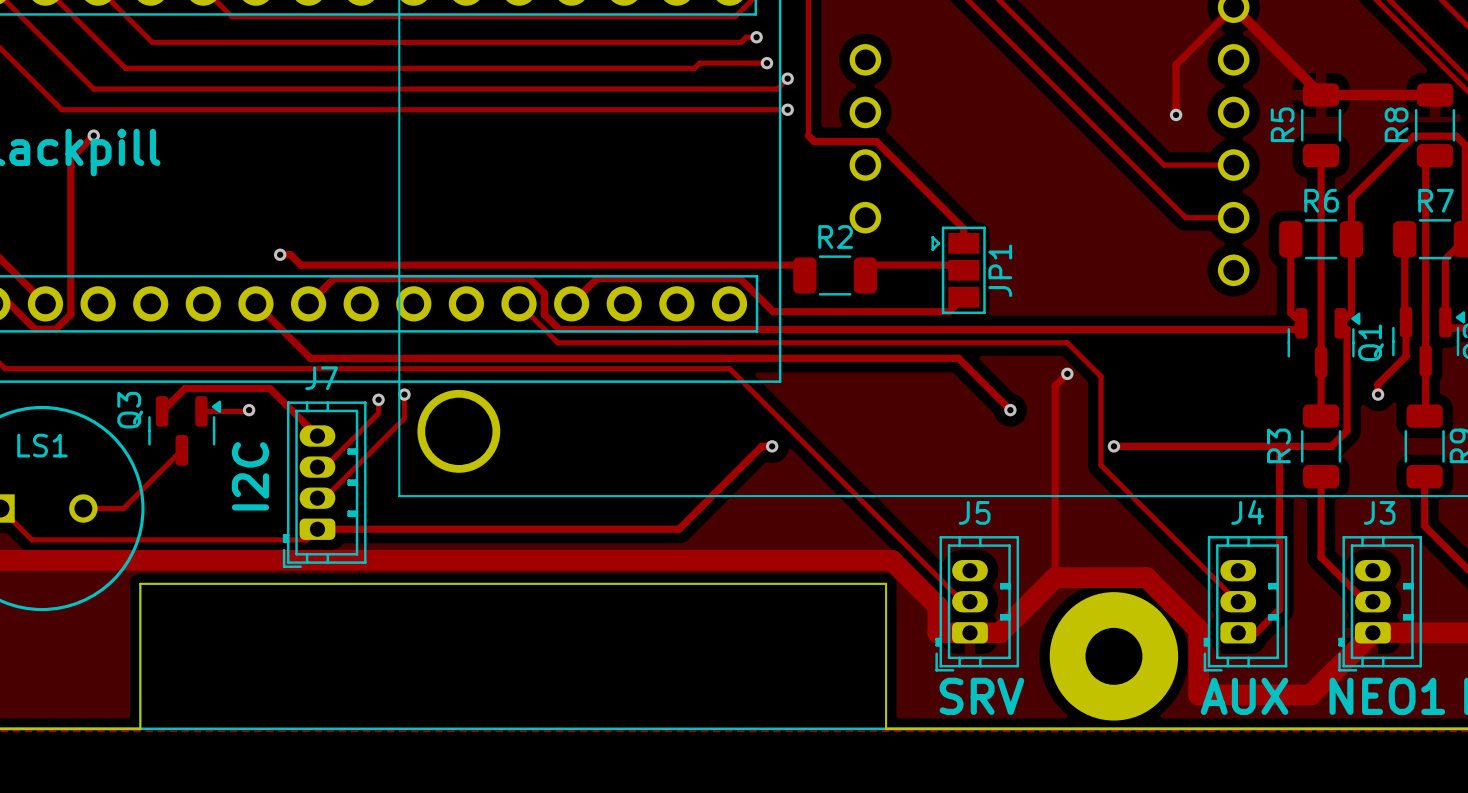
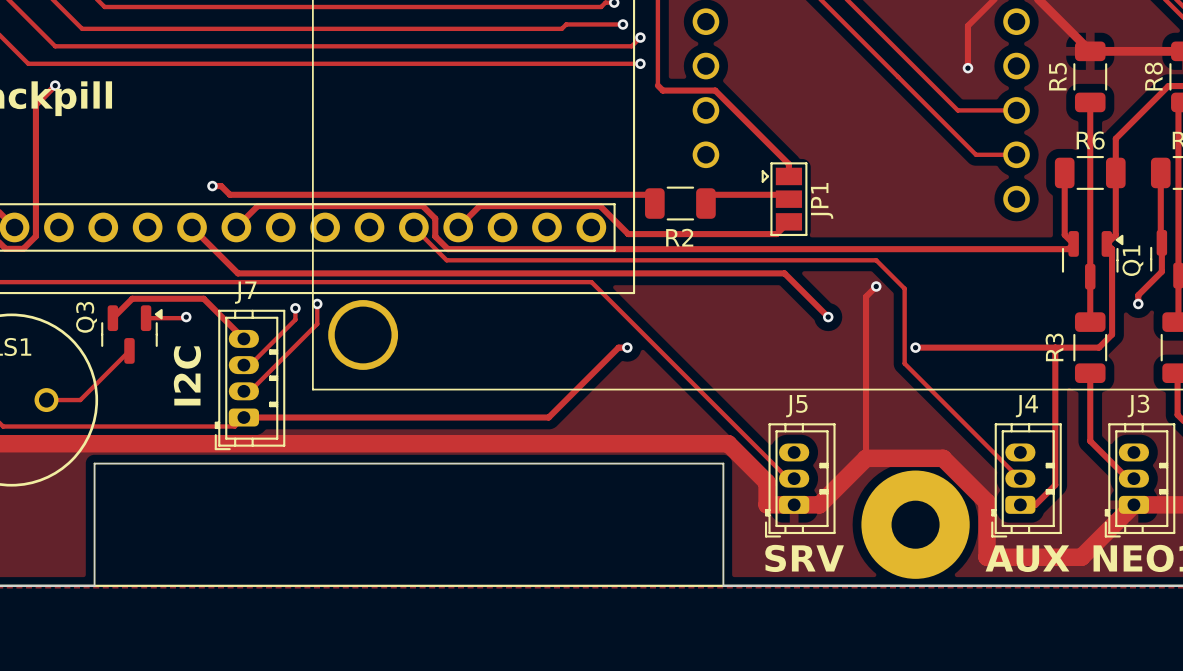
R2 name position: R2 (835, 237) -> R2 (679, 237)

